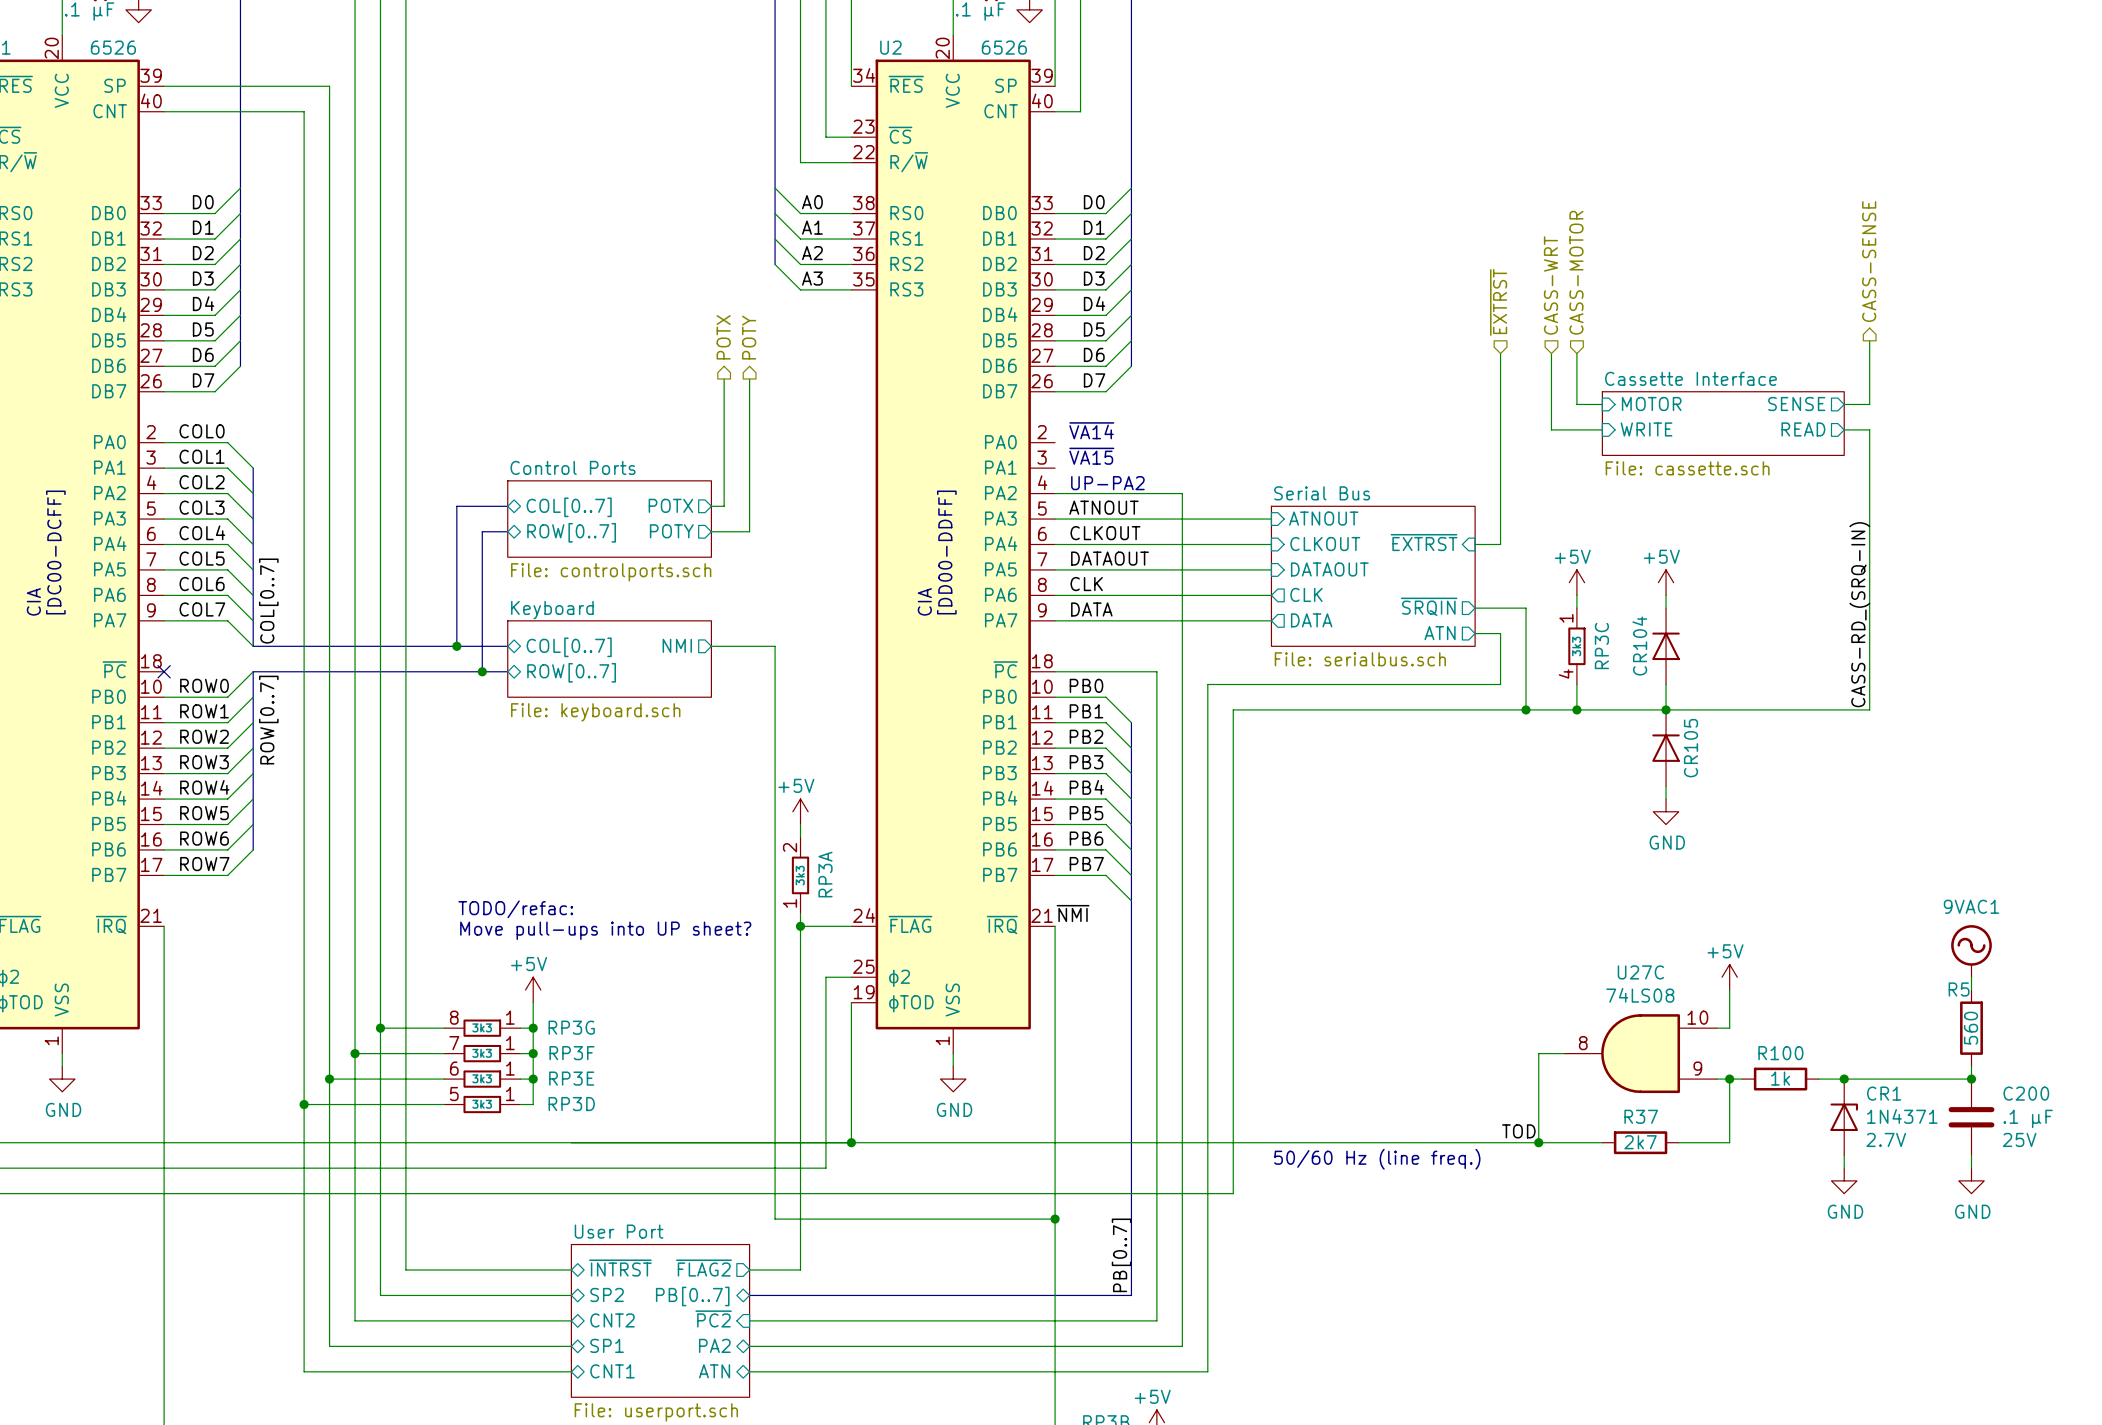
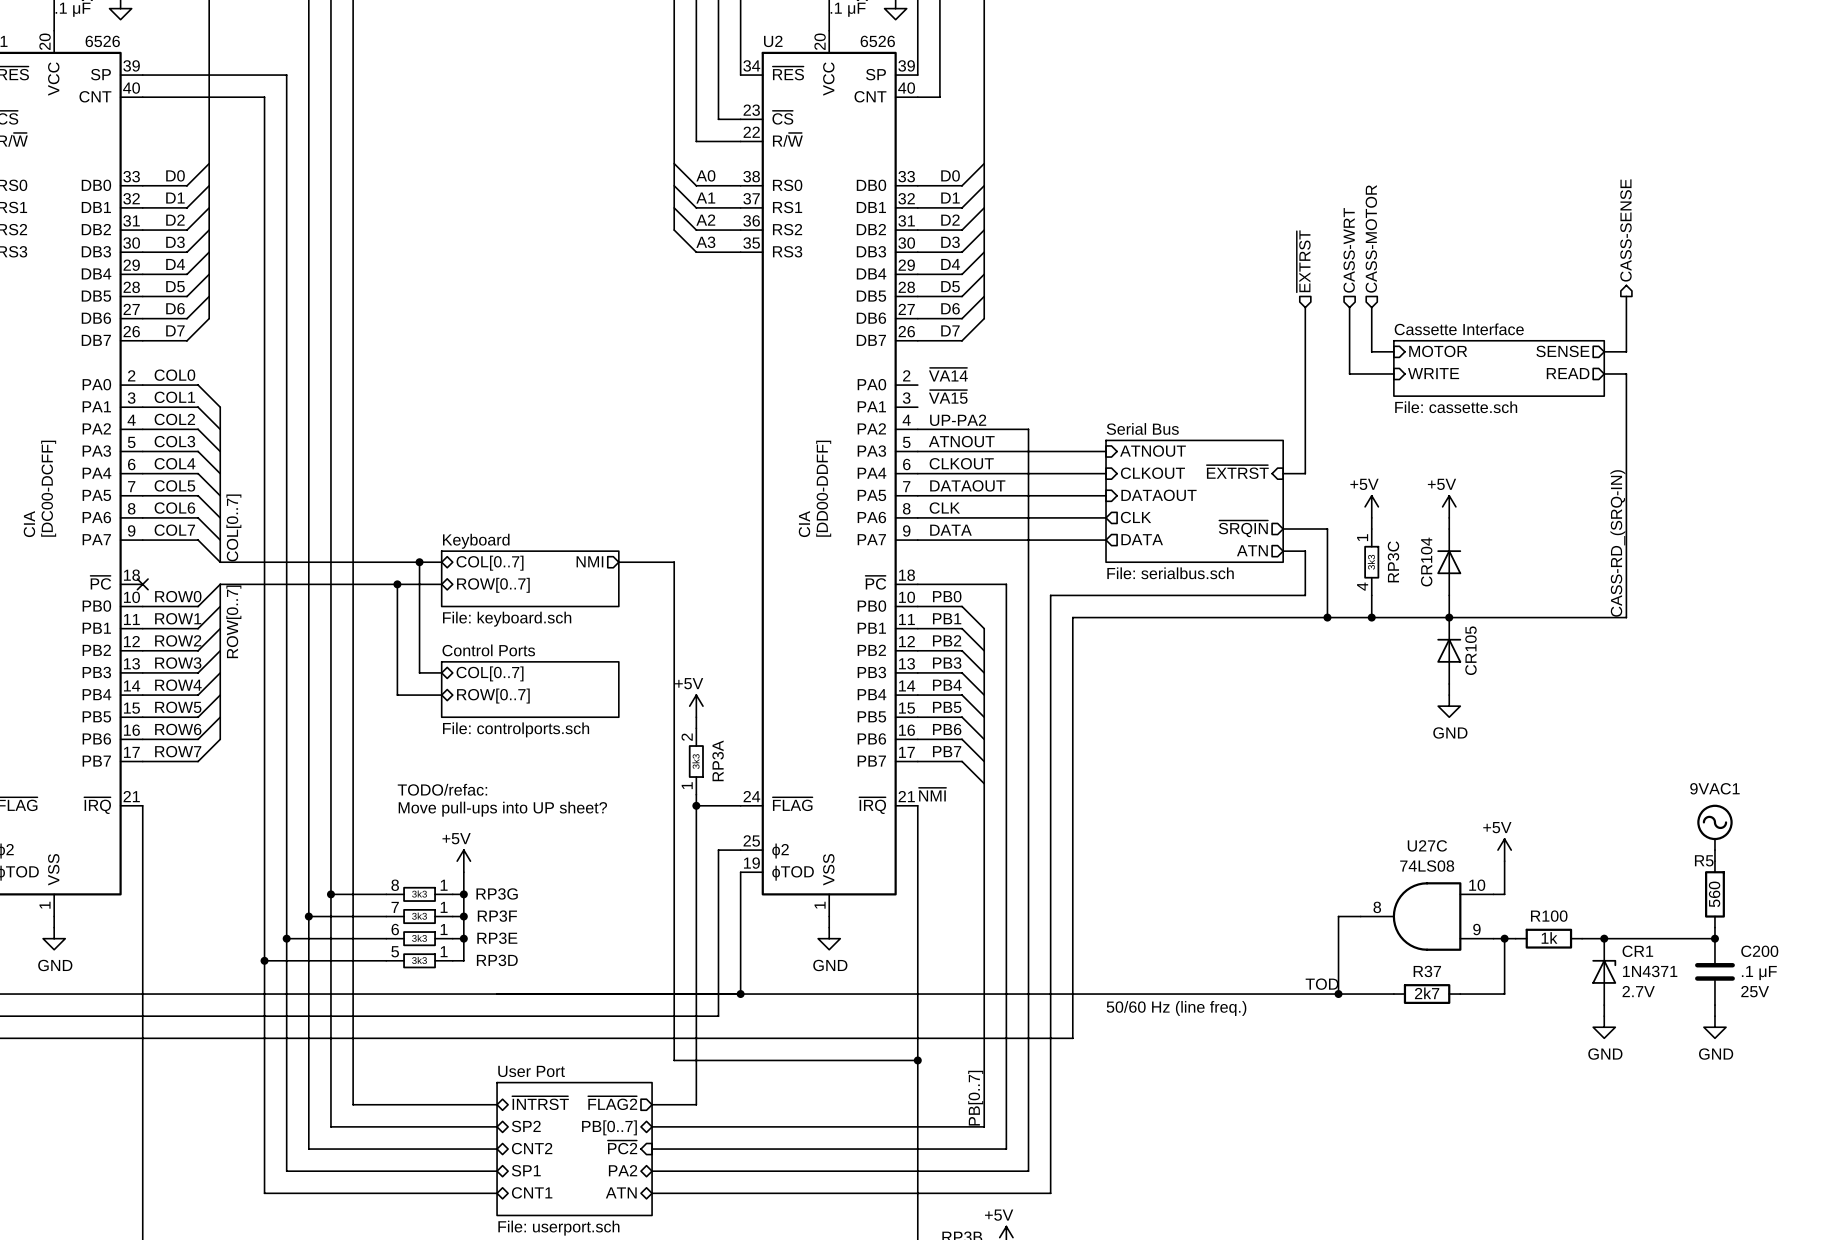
hierarchical label: POTX (723, 337) -> none
hierarchical label: POTY (749, 337) -> none
wire: (724, 379) (724, 506) (711, 506) -> none
wire: (749, 379) (749, 531) (711, 531) -> none
sheet pin: POTX (670, 505) -> none
bus: (507, 506) (456, 506) (456, 646) -> none
sheet pin: COL[0..7] (569, 507) -> none
sheet Control Ports: File: controlports.sch (609, 519) -> none
bus: (507, 531) (482, 531) (482, 646) -> none
sheet pin: POTY (671, 531) -> none
sheet pin: ROW[0..7] (571, 532) -> none
sheet Keyboard shape: [507, 620, 712, 698] -> [441, 551, 619, 607]
junction: (456, 646) -> none
junction: none -> (419, 562)
bus: none -> (397, 584) (397, 695) (441, 695)
junction: none -> (397, 584)
bus: none -> (419, 584) (419, 672) (441, 672)
junction: (482, 671) -> none
sheet pin: none -> COL[0..7] (490, 673)
sheet Control Ports: none -> File: controlports.sch (530, 689)
sheet pin: none -> ROW[0..7] (493, 696)

